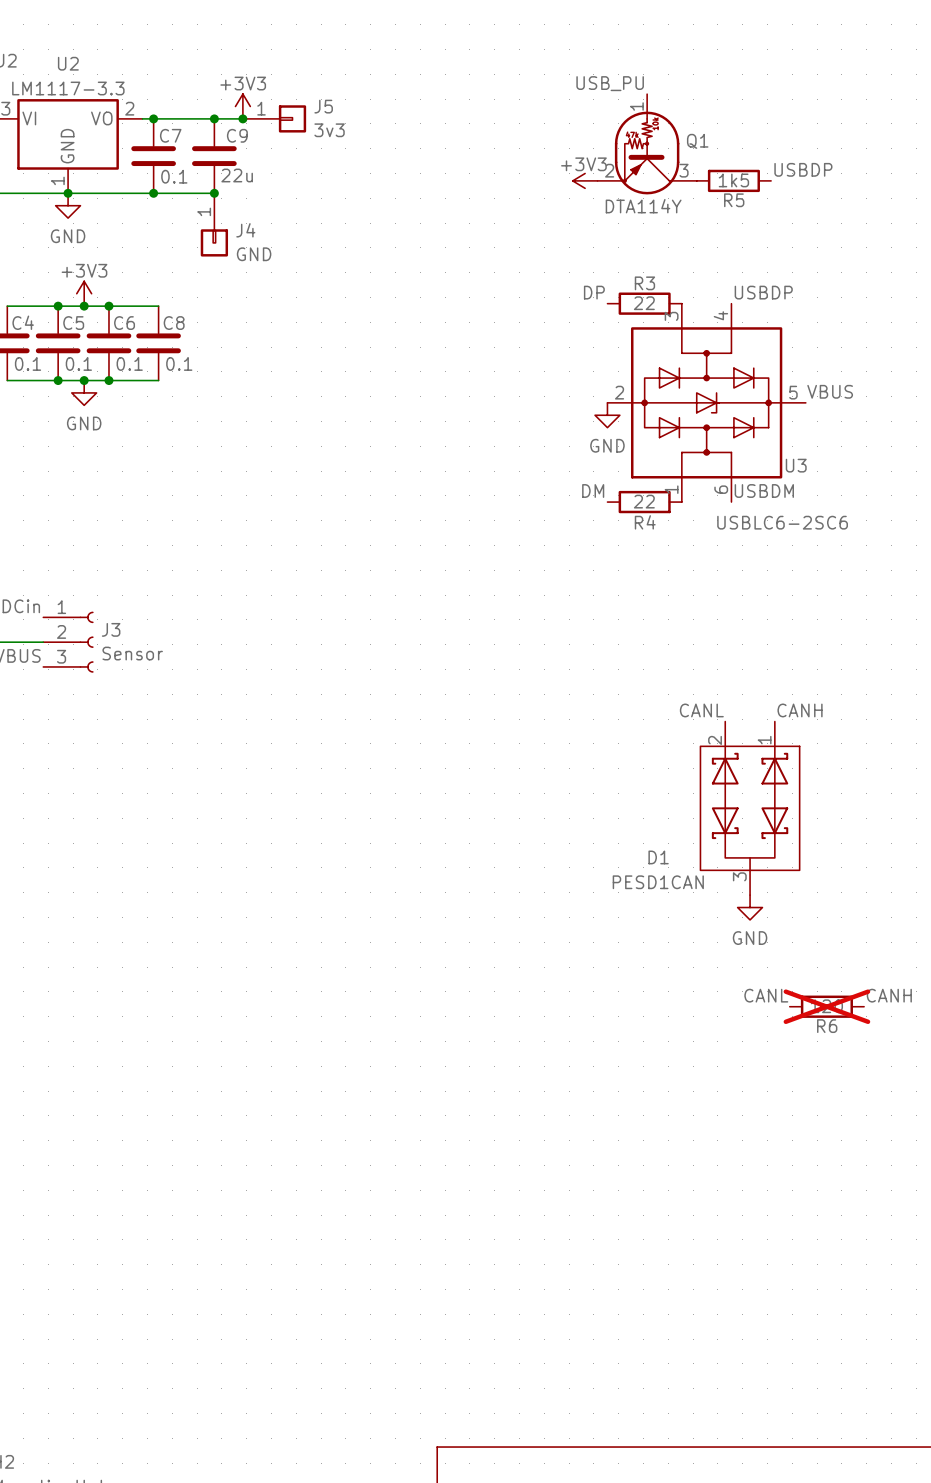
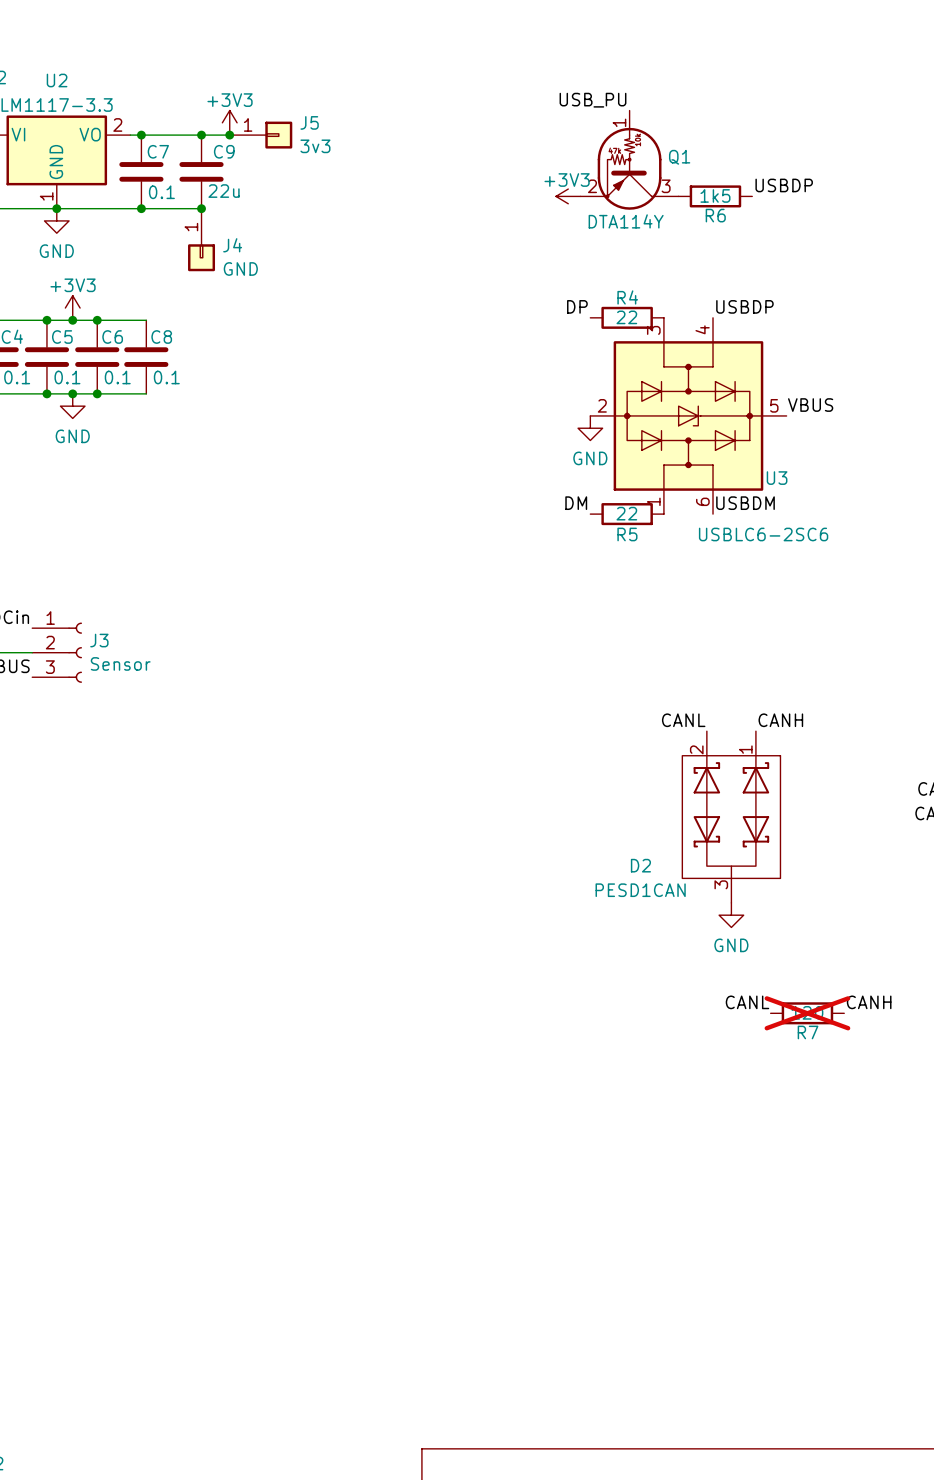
R5 name: R5 (734, 200) -> R6 (715, 215)
R3 name: R3 (644, 283) -> R4 (627, 297)
R4 name: R4 (645, 522) -> R5 (627, 534)
D1 name: D1 (658, 857) -> D2 (640, 865)
R6 name: R6 (827, 1026) -> R7 (808, 1032)

